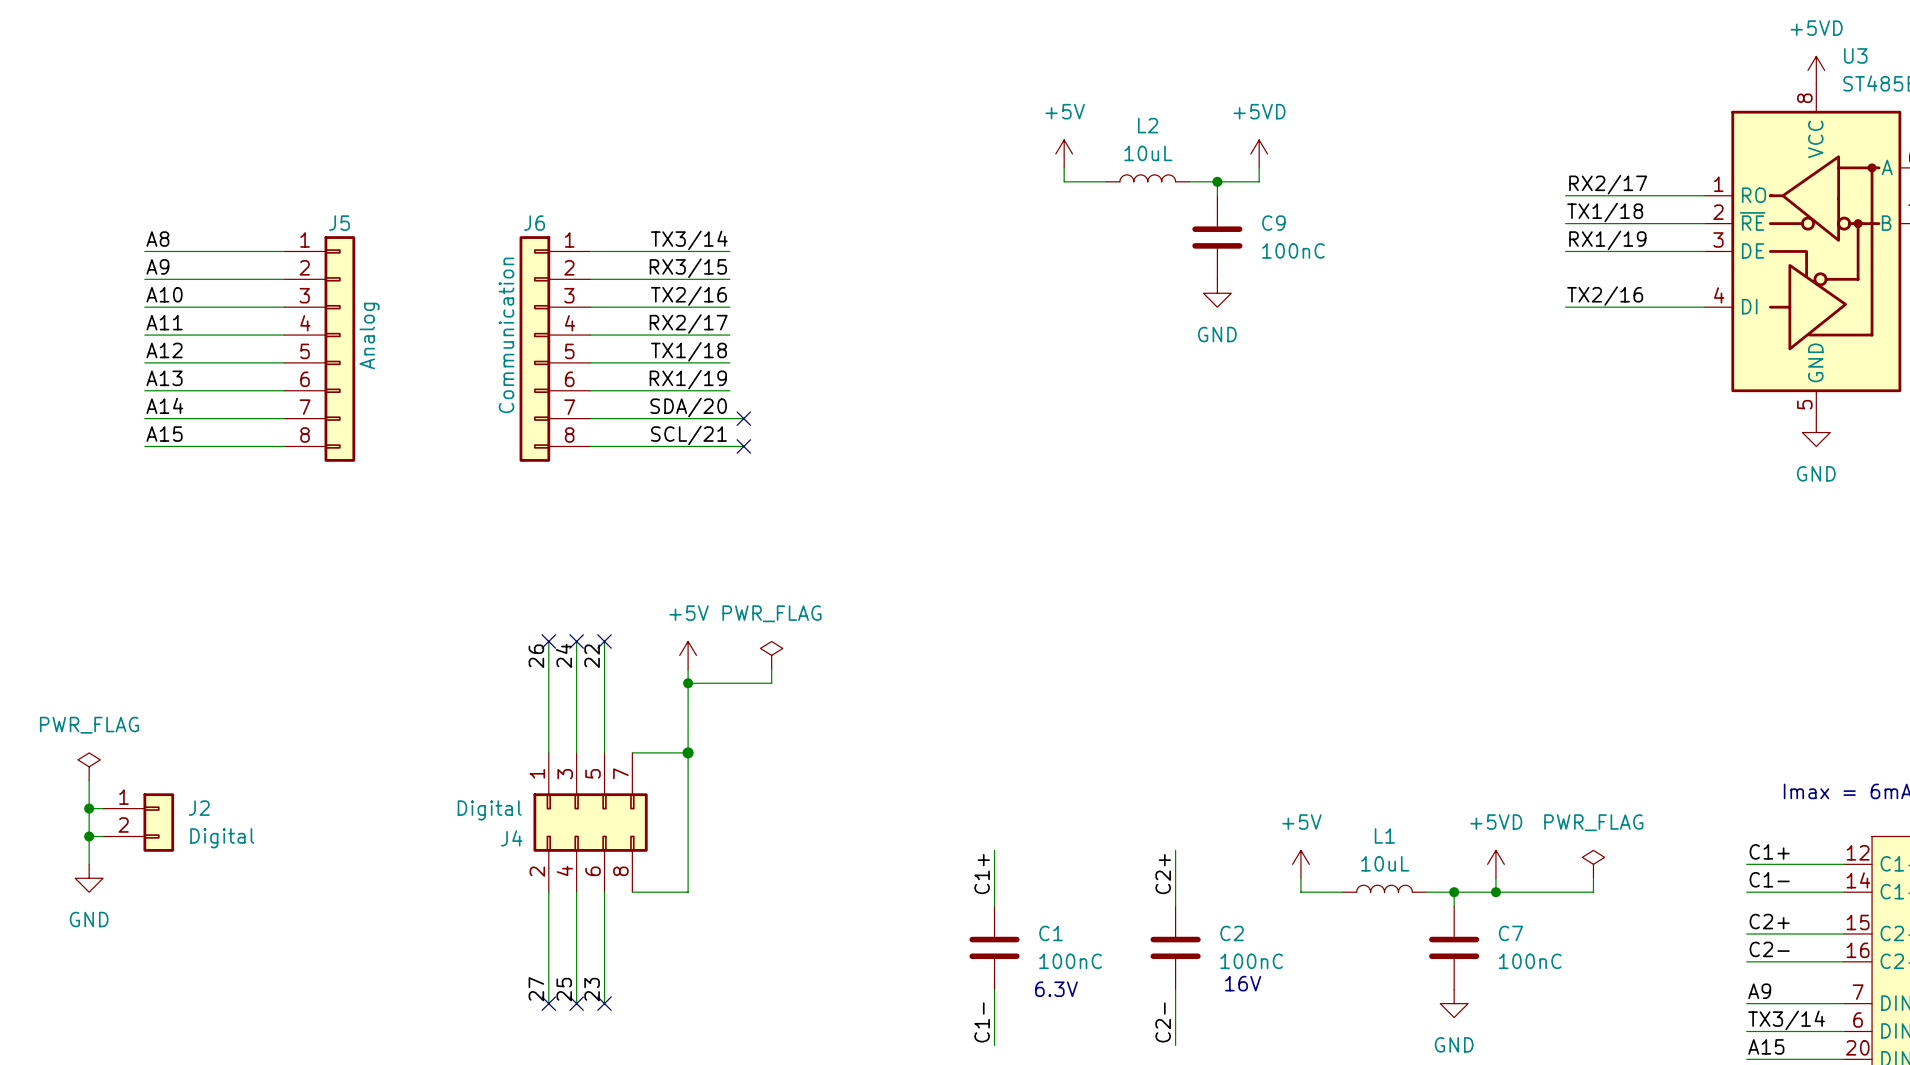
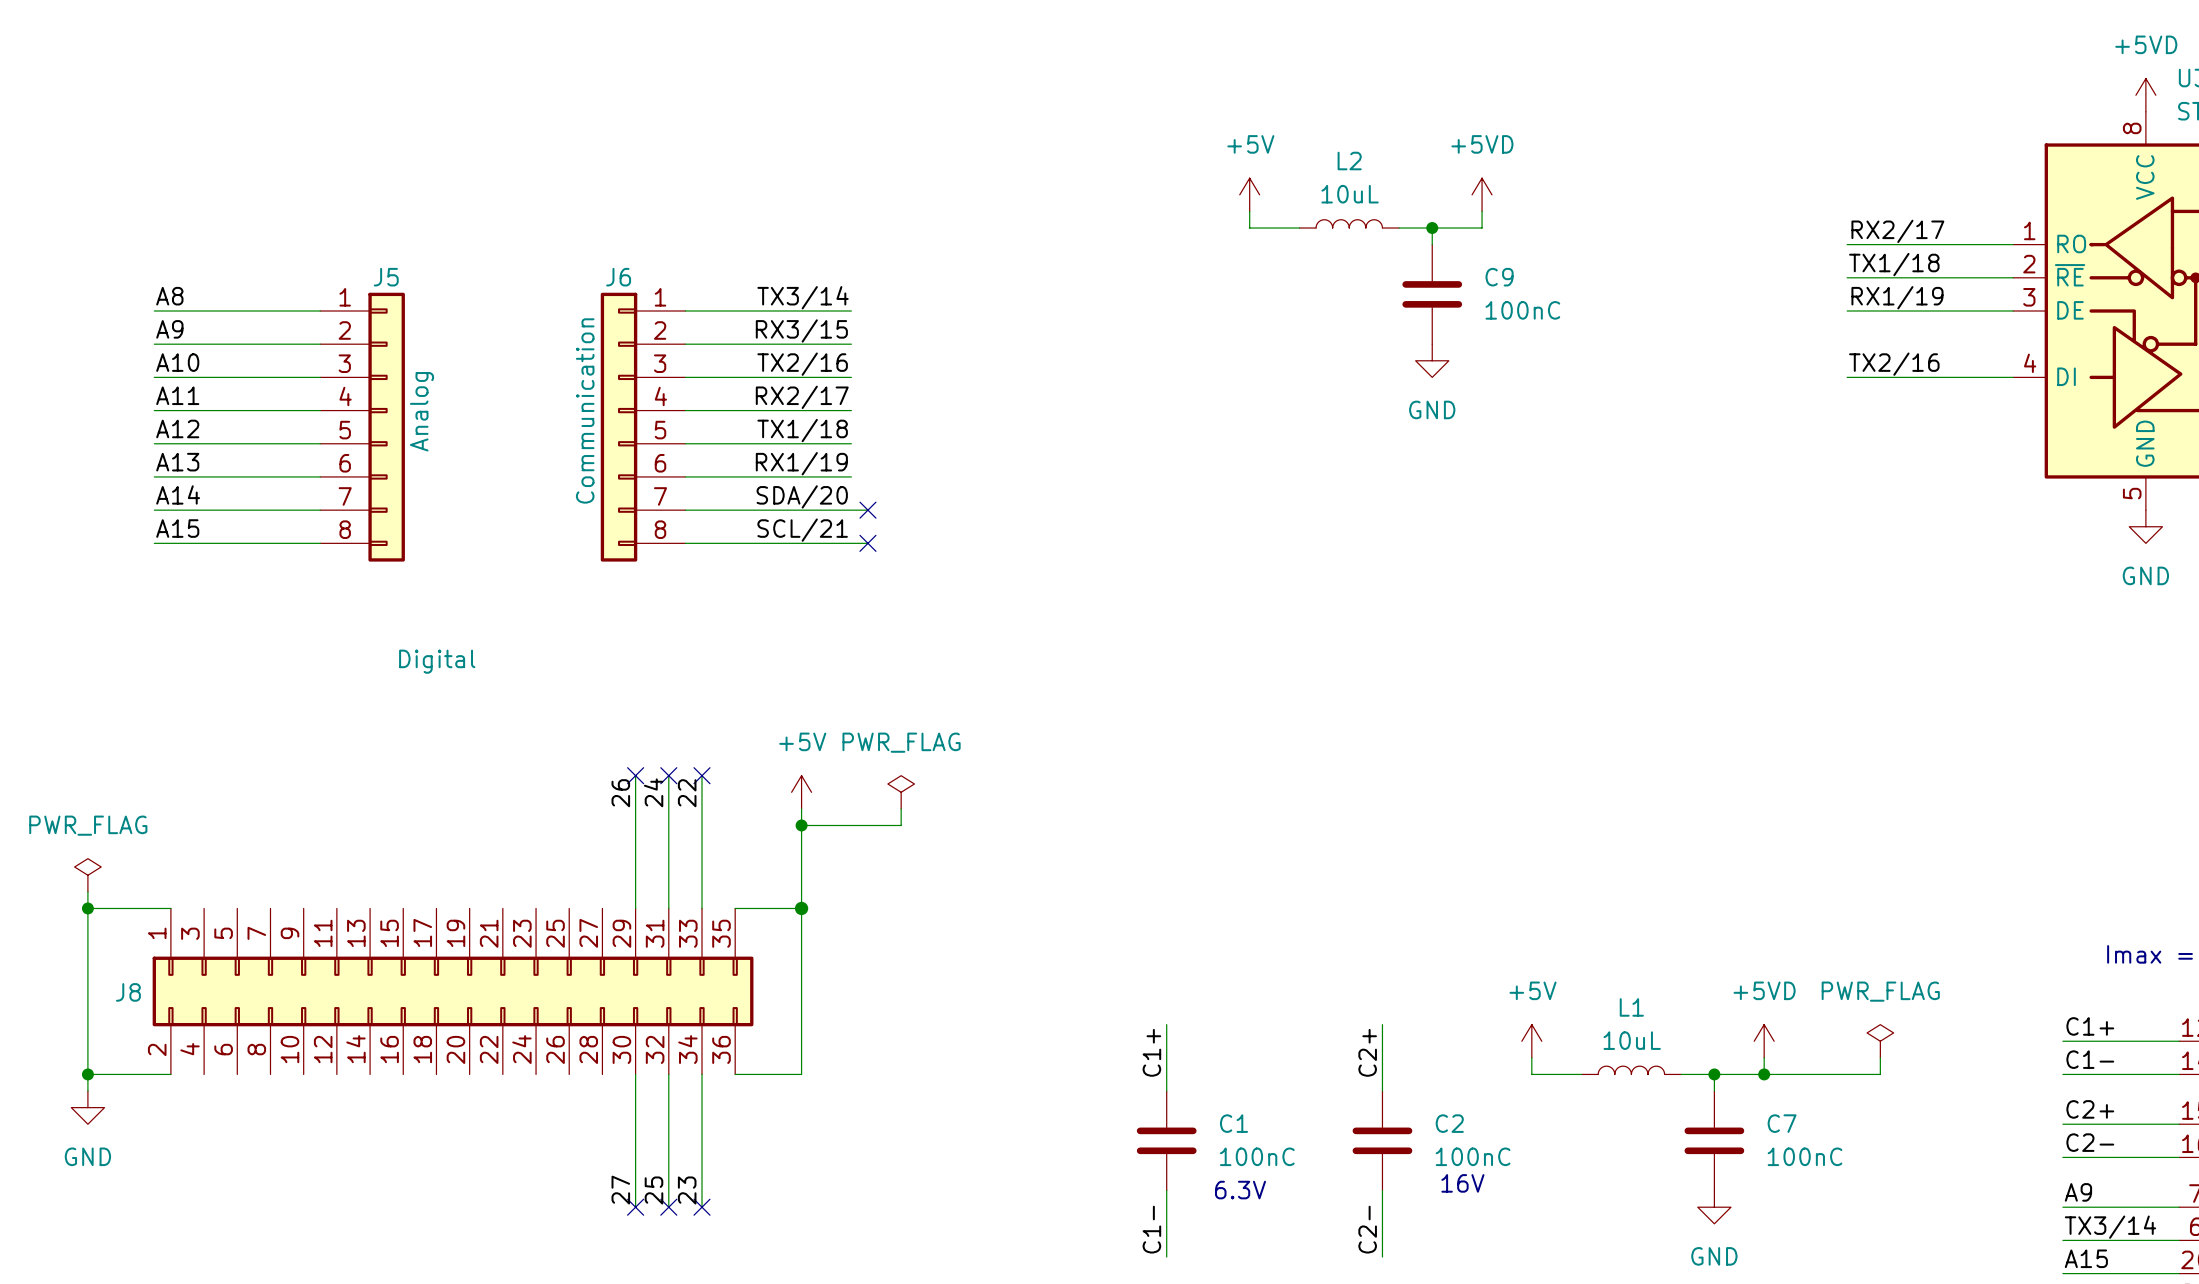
wire: none -> (87, 891) (87, 941)
wire: none -> (87, 908) (170, 908)
junction: none -> (87, 908)
power symbol position: PWR_FLAG (89, 766) -> PWR_FLAG (87, 875)
wire: (89, 808) (103, 808) -> none
junction: (89, 808) -> none
J2: Digital (138, 822) -> none
J8: none -> Digital (453, 991)
J4: Digital (590, 822) -> none
wire: (89, 836) (103, 836) -> none
junction: (89, 836) -> none
wire: none -> (87, 1041) (87, 1091)
power symbol position: GND (89, 878) -> GND (87, 1107)
wire: none -> (87, 1074) (170, 1074)
junction: none -> (87, 1074)

